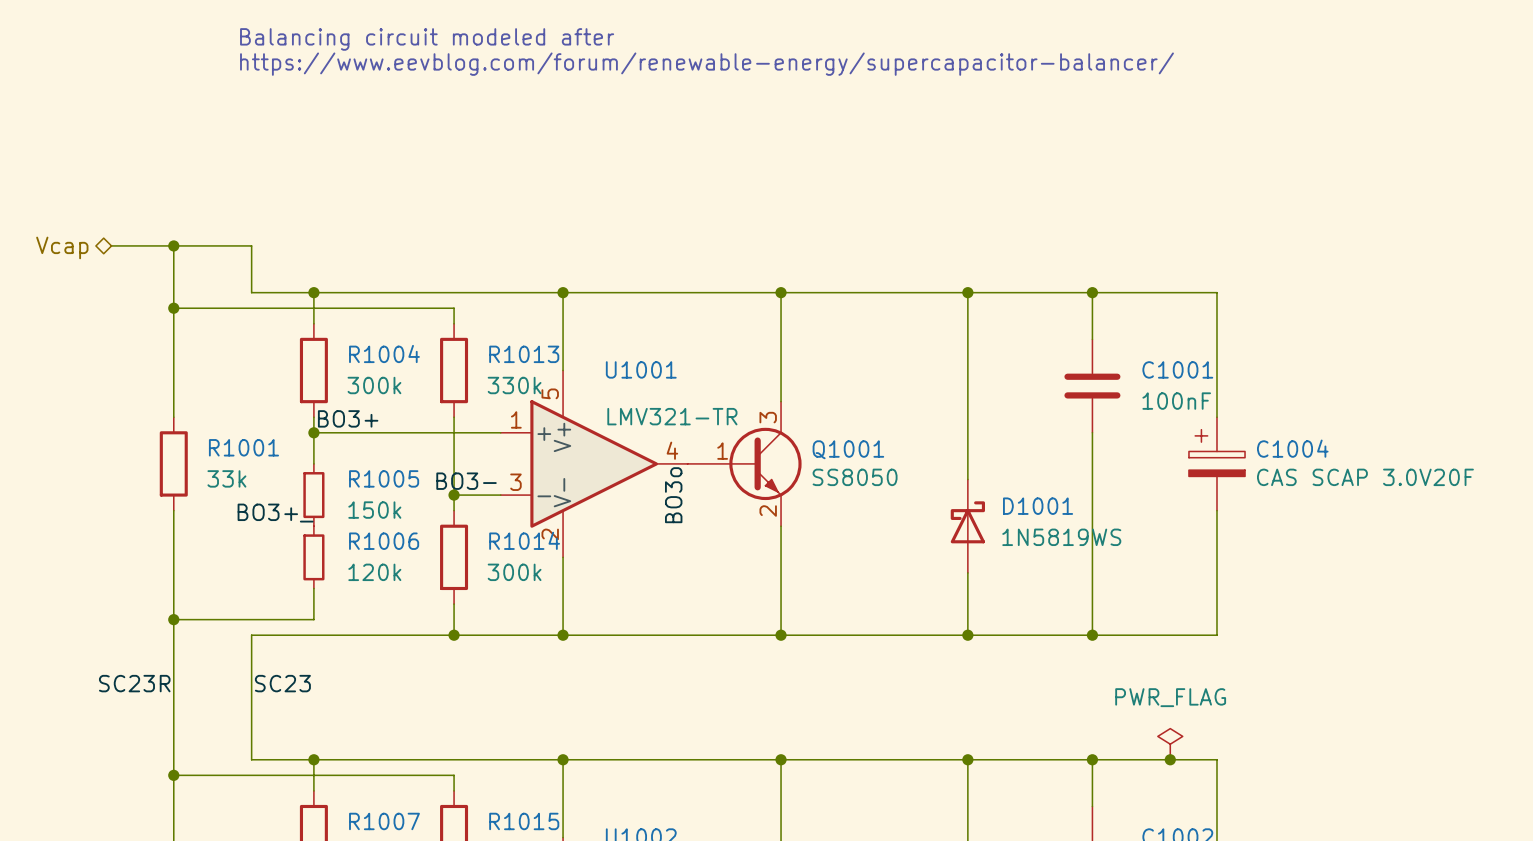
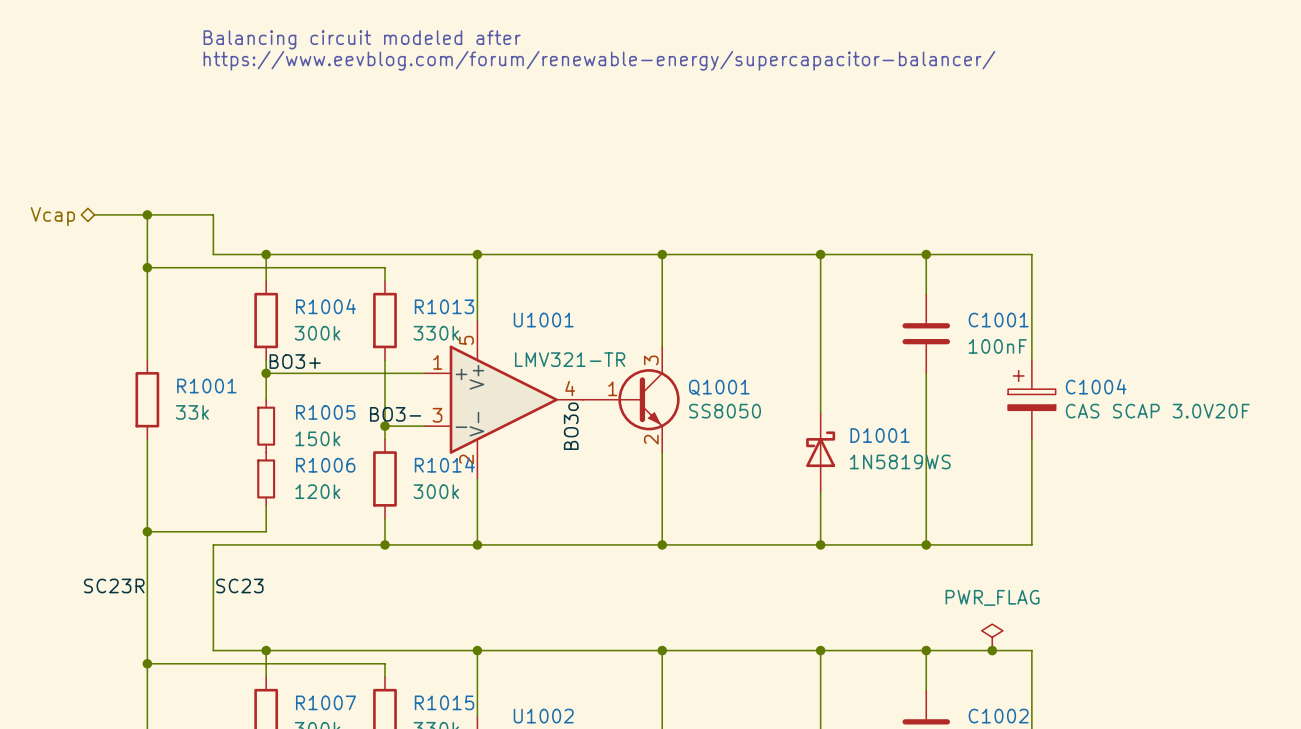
label: BO3+_ (275, 513) -> none

